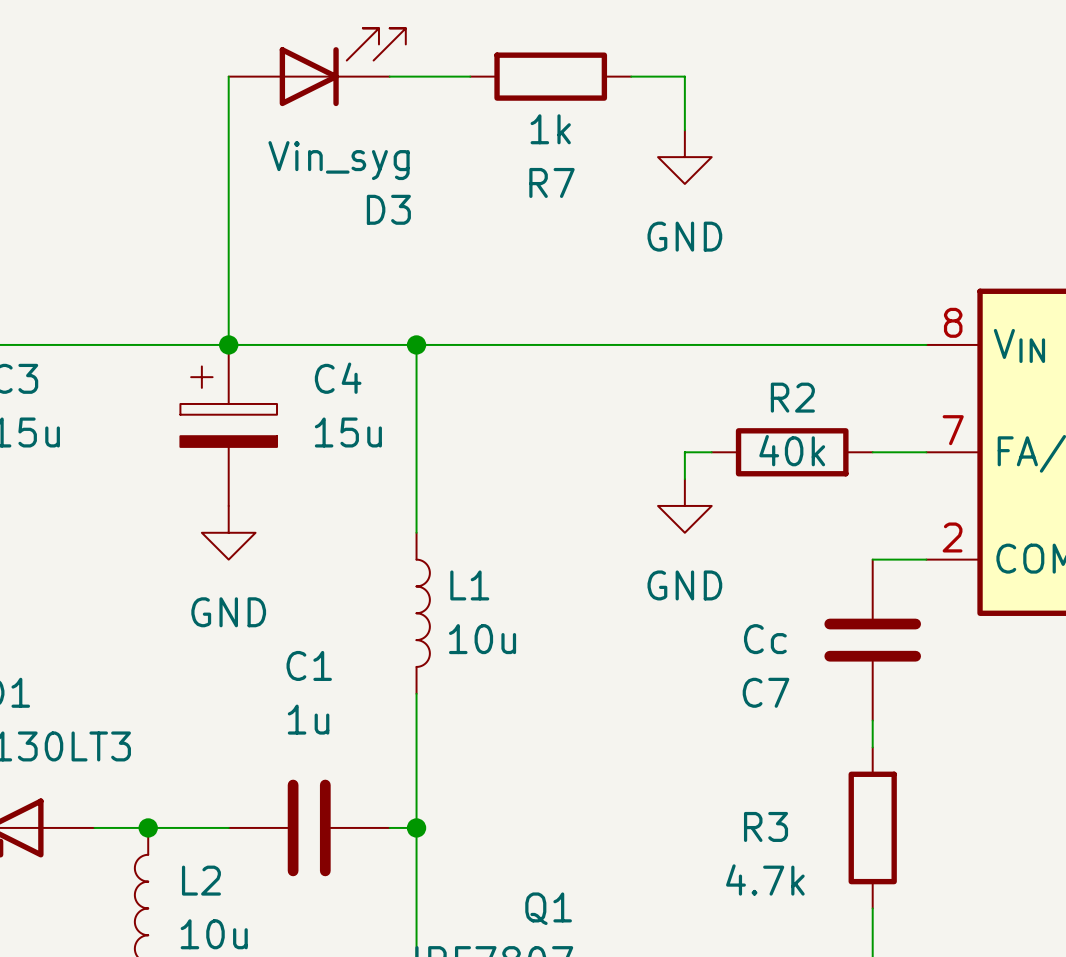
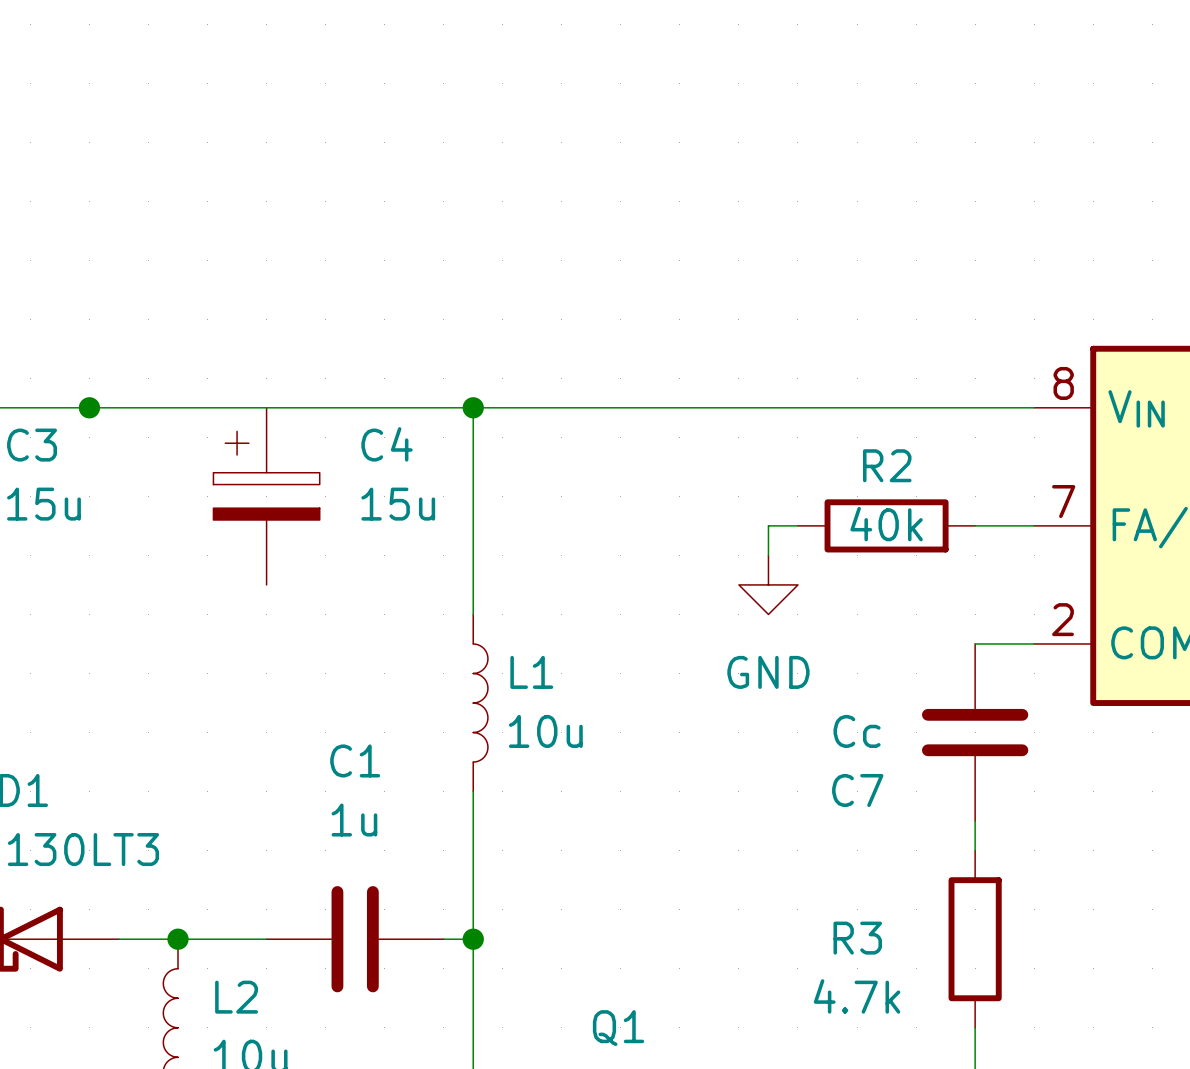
D3: Vin_syg (317, 67) -> none
wire: (228, 76) (228, 344) -> none
wire: (389, 76) (470, 76) -> none
R7: 1k (550, 76) -> none
wire: (631, 76) (684, 76) (684, 130) -> none
power symbol: GND (684, 157) -> none
junction: none -> (89, 407)
junction: (228, 344) -> none
power symbol: GND (228, 532) -> none

